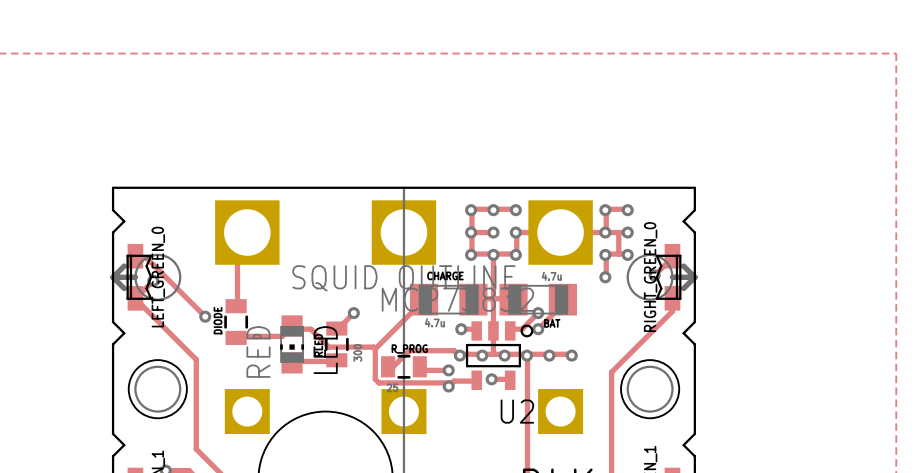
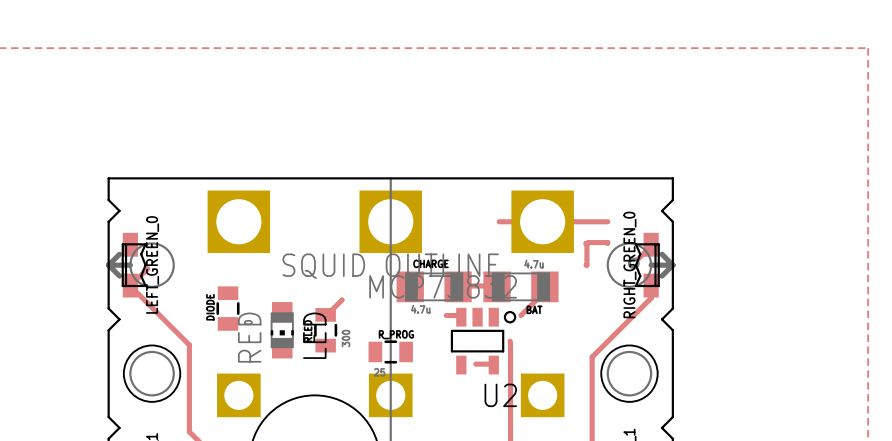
via: (471, 210) -> none
via: (493, 210) -> none
track: (515, 210) (471, 210) (471, 232) (493, 232) -> none
via: (515, 210) -> none
via: (605, 210) -> none
track: (627, 210) (605, 210) (606, 232) -> none
via: (627, 210) -> none
track: (247, 232) (237, 241) (236, 306) -> none
track: (471, 232) (471, 254) (493, 254) (493, 354) -> none
via: (471, 232) -> none
via: (493, 232) -> none
via: (515, 232) -> none
track: (516, 232) (515, 254) (493, 254) -> none
via: (605, 232) -> none
track: (618, 232) (618, 254) -> none
via: (627, 232) -> none
via: (471, 254) -> none
via: (493, 254) -> none
via: (515, 254) -> none
via: (605, 254) -> none
via: (627, 254) -> none
track: (135, 256) (146, 257) (205, 316) -> none
via: (605, 277) -> none
via: (153, 280) -> none
track: (424, 299) (375, 348) -> none
via: (353, 313) -> none
track: (538, 313) (522, 329) (511, 329) (510, 330) -> none
via: (538, 313) -> none
via: (205, 316) -> none
via: (461, 329) -> none
via: (538, 329) -> none
track: (236, 337) (282, 336) (292, 325) (292, 329) (310, 329) (328, 347) (373, 347) (375, 348) -> none
track: (375, 348) (375, 379) (378, 382) (452, 382) (454, 381) (476, 380) -> none
via: (459, 355) -> none
via: (482, 355) -> none
via: (504, 355) -> none
via: (527, 355) -> none
via: (549, 355) -> none
track: (571, 355) (459, 355) (454, 350) (409, 350) (393, 366) (388, 366) -> none
via: (571, 355) -> none
track: (336, 360) (292, 362) -> none
track: (420, 366) (423, 370) (448, 370) -> none
via: (448, 370) -> none
via: (491, 379) -> none
via: (448, 386) -> none

